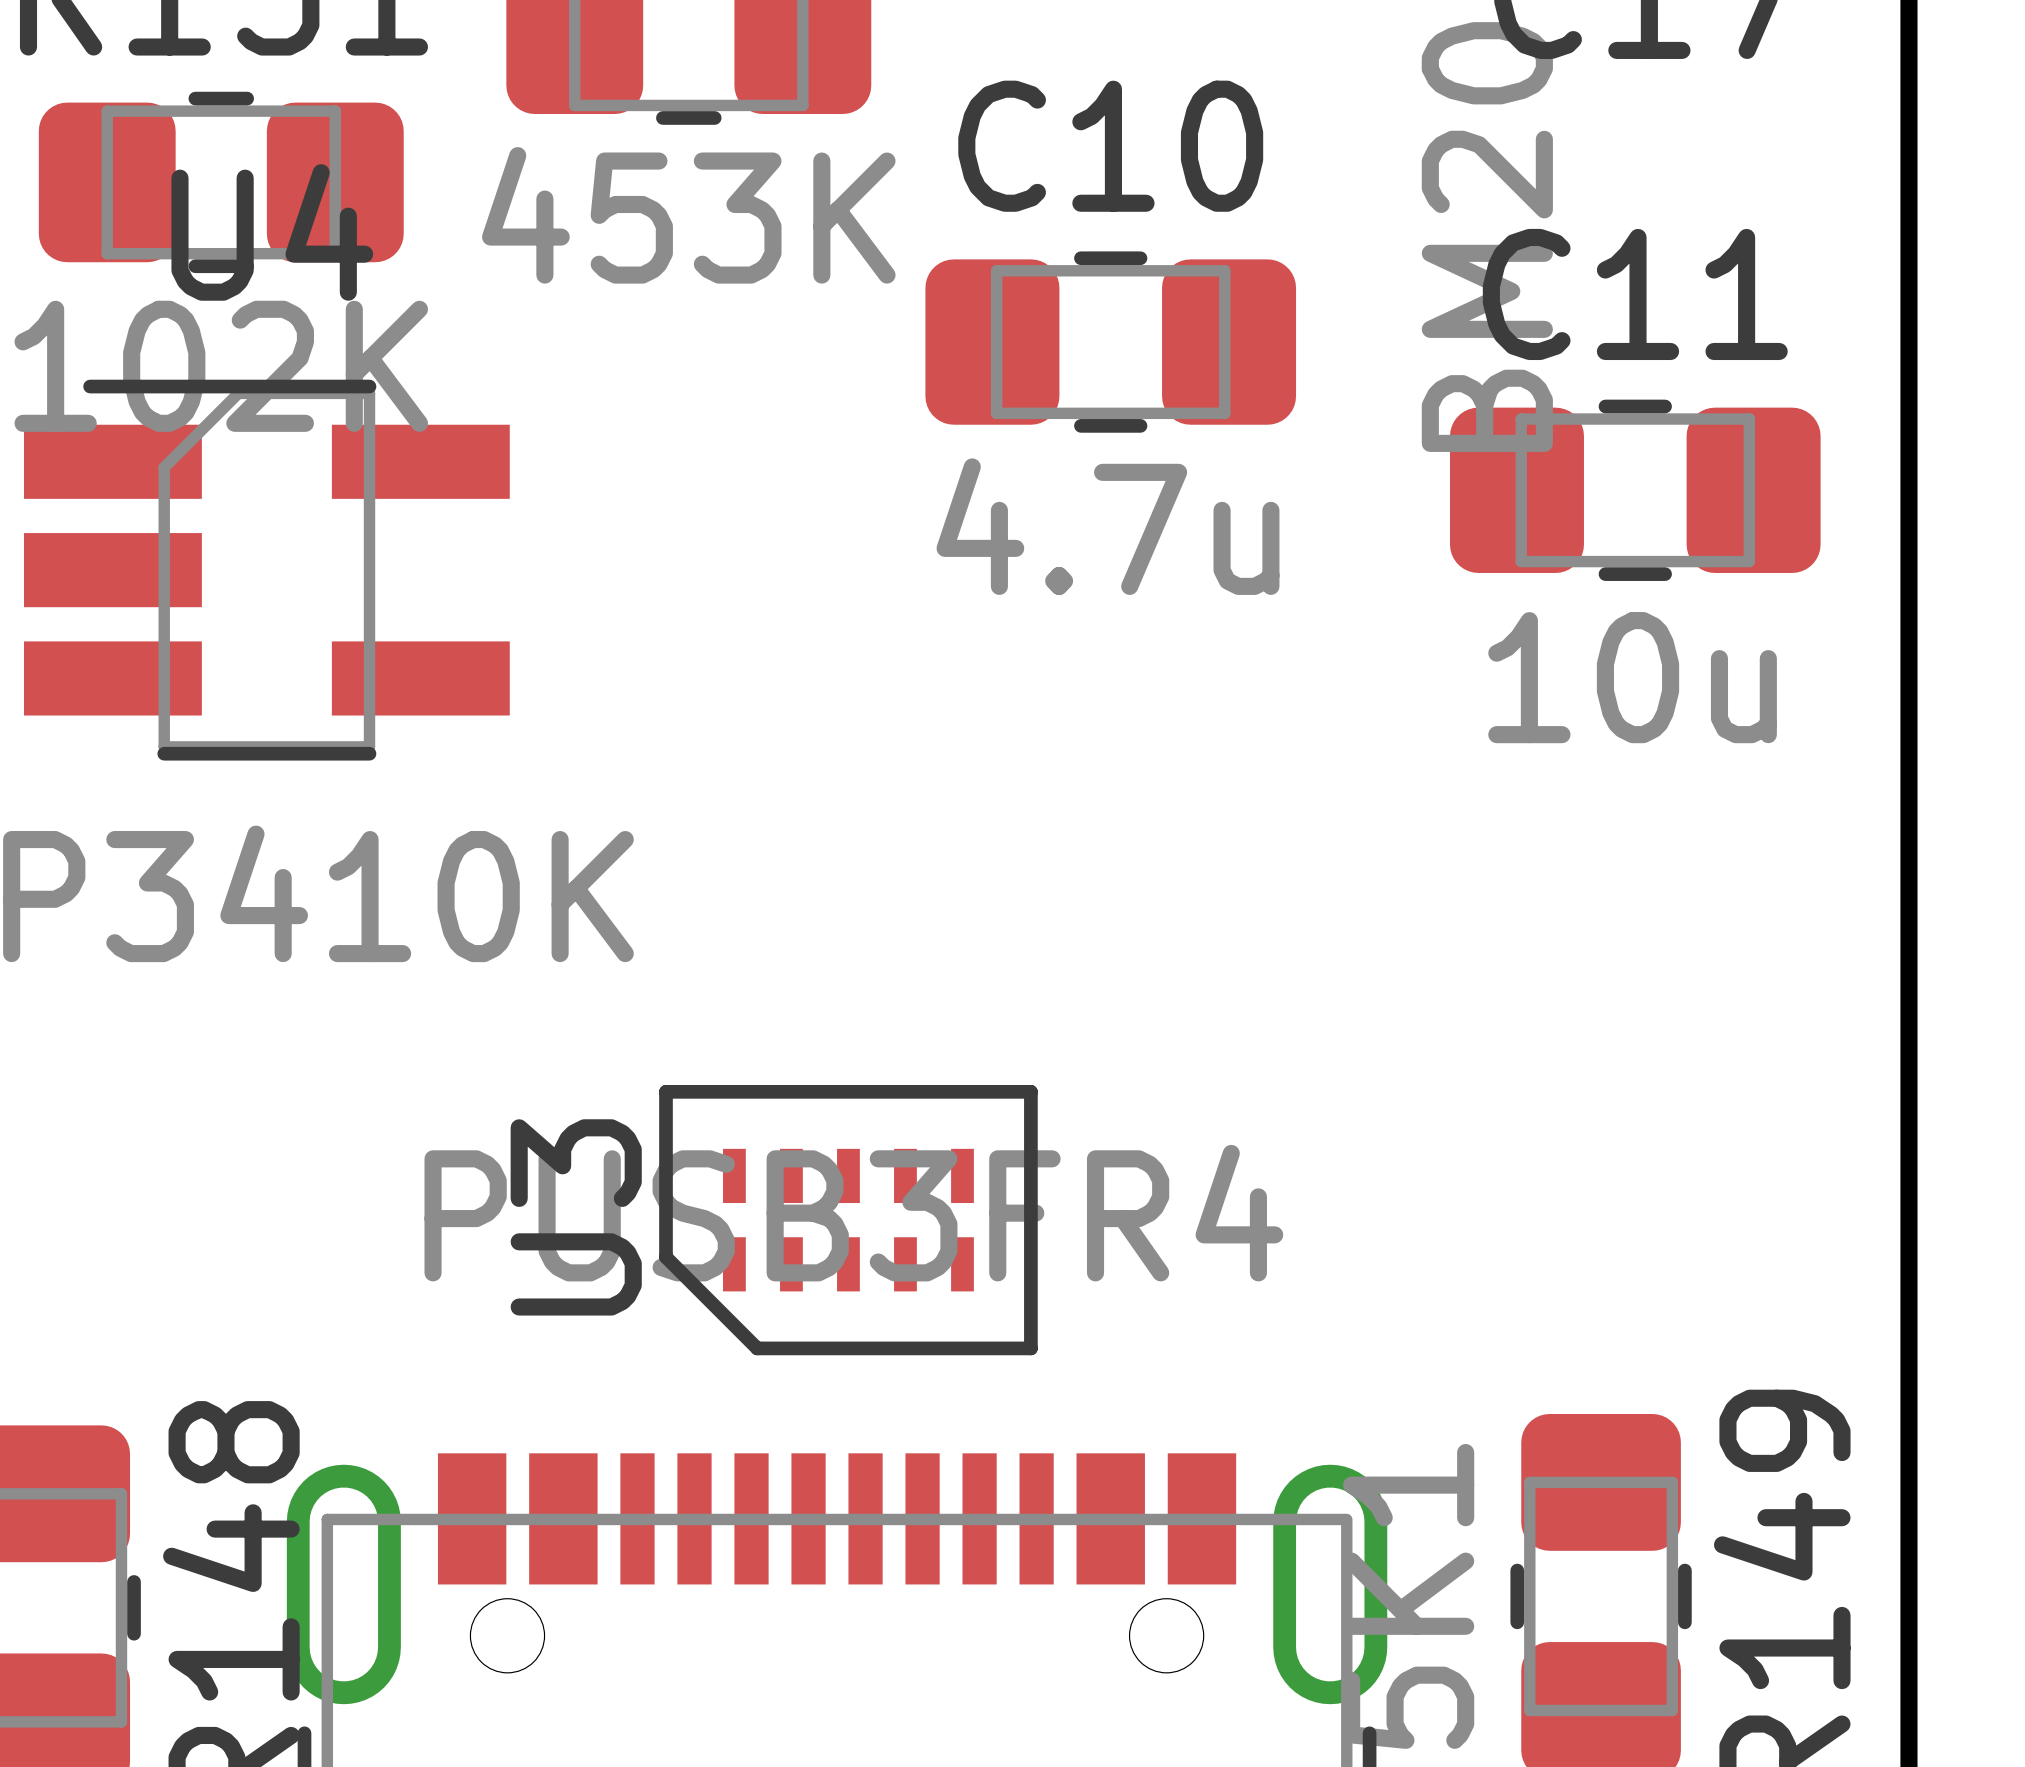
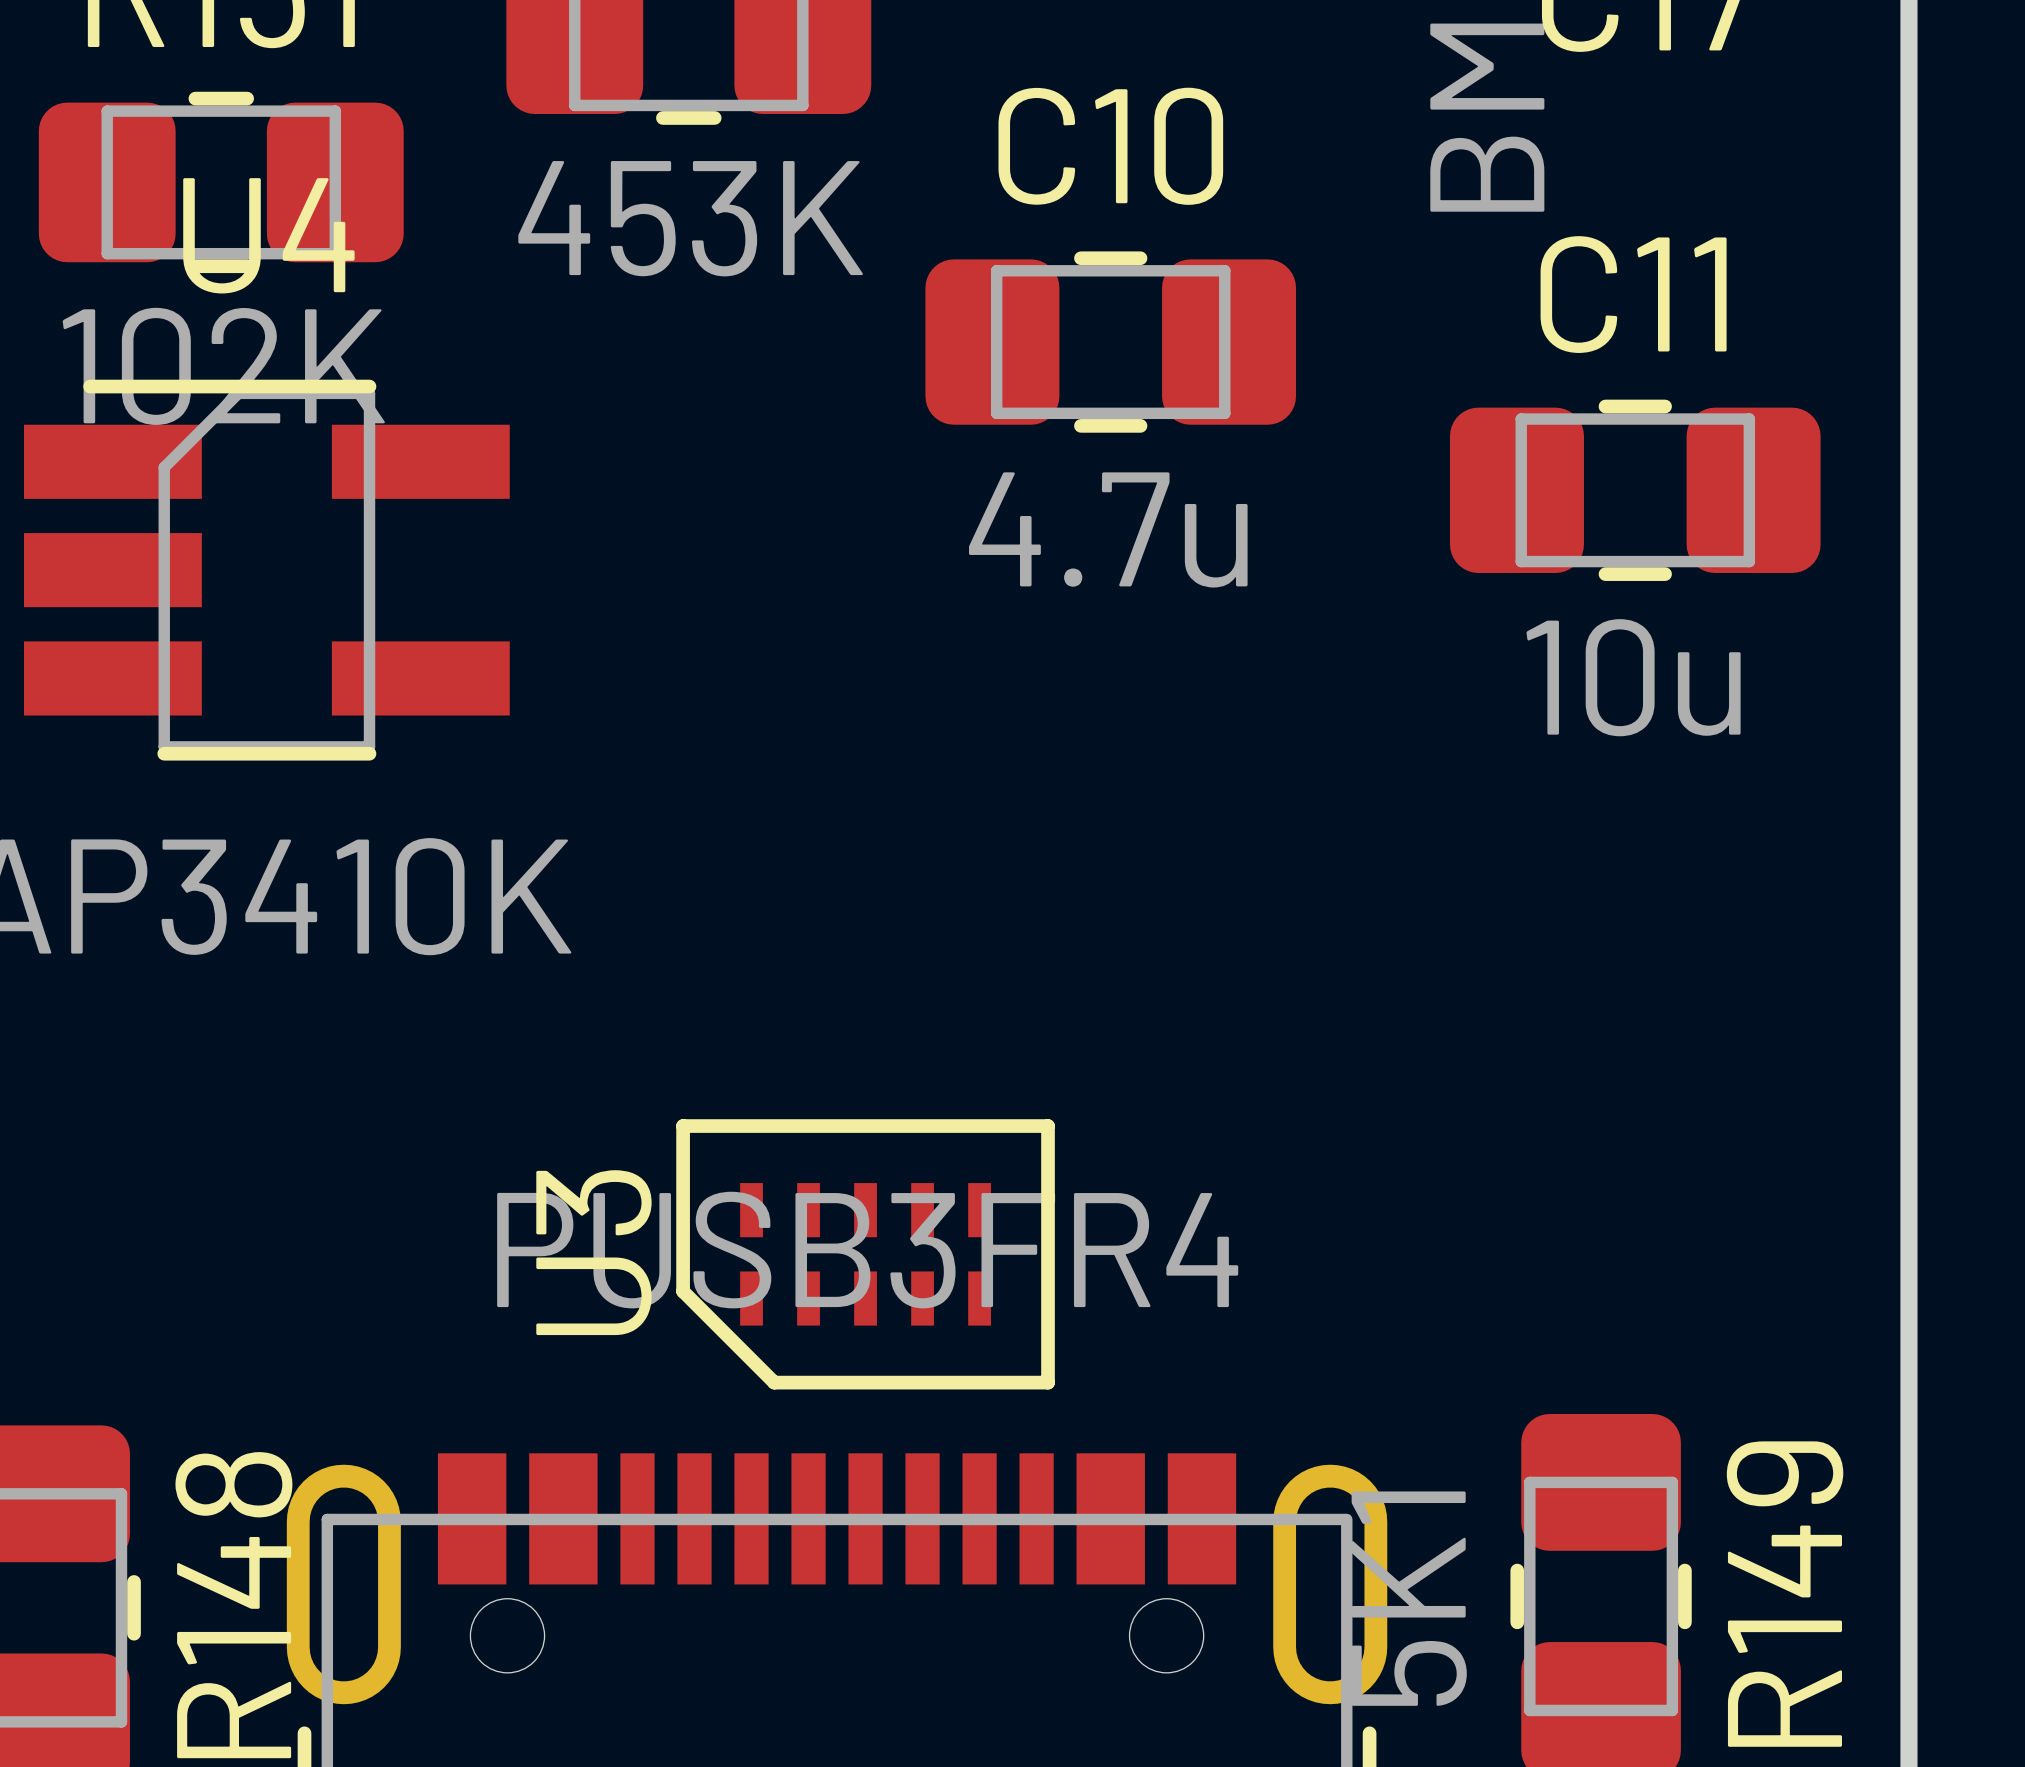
U3 position: (848, 1220) -> (865, 1254)

